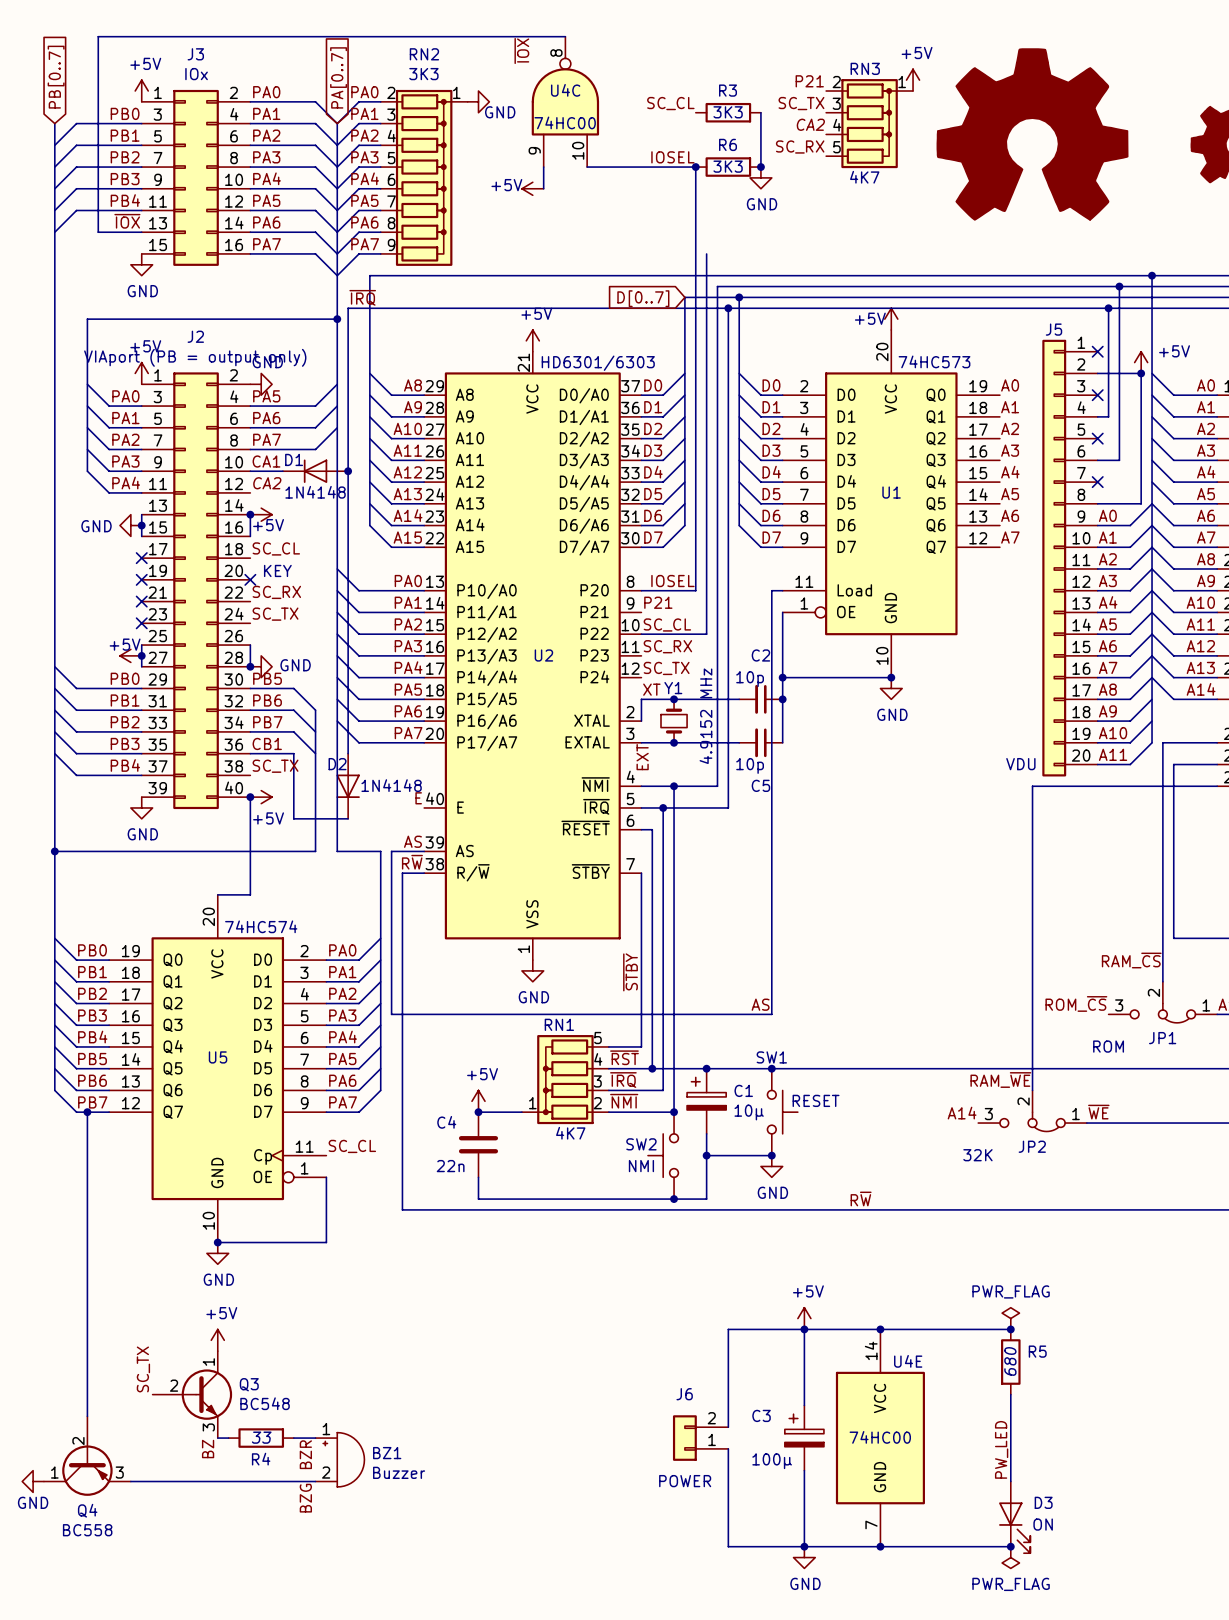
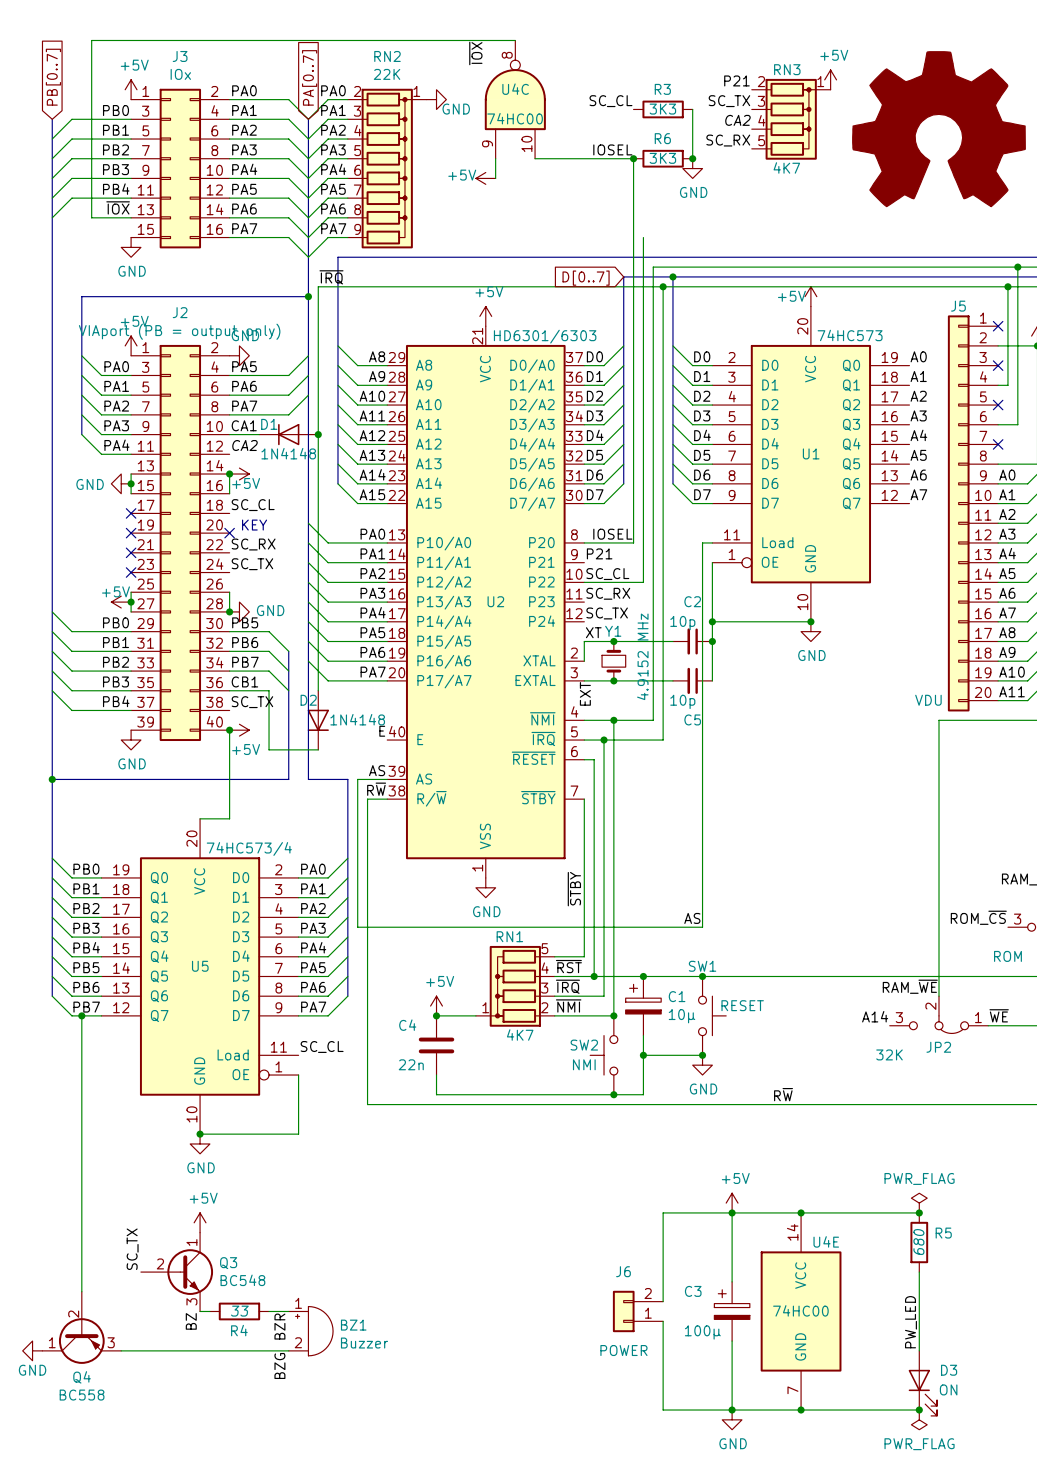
RN2 value: 3K3 (423, 74) -> 22K (387, 74)
U5 symbol: [109, 894, 327, 1243] -> [101, 818, 299, 1135]
U5 value: 74HC574 (261, 926) -> 74HC573/4 (249, 848)

